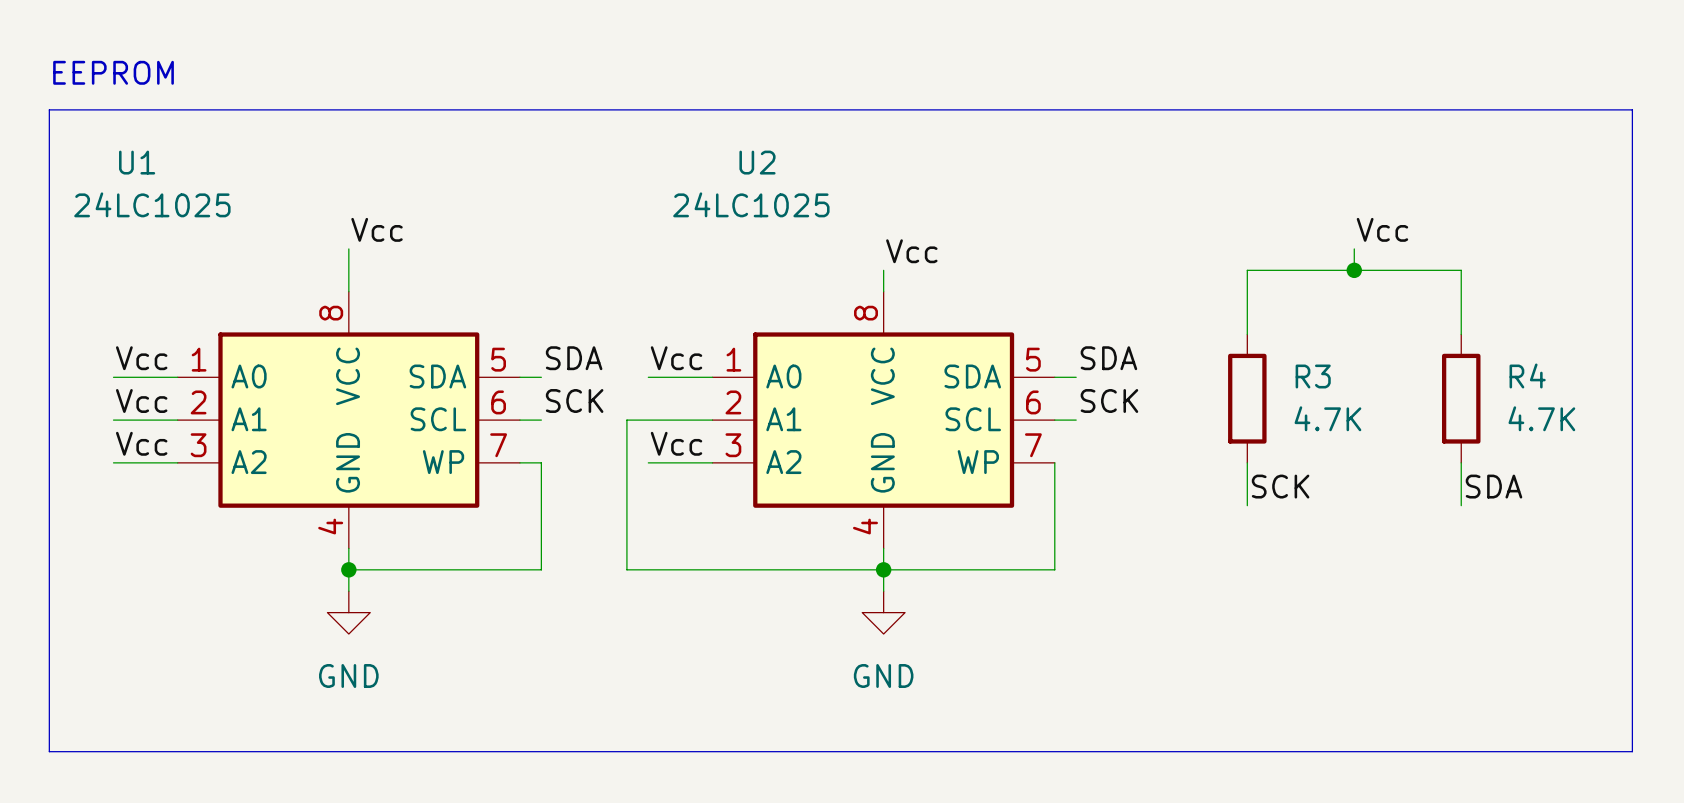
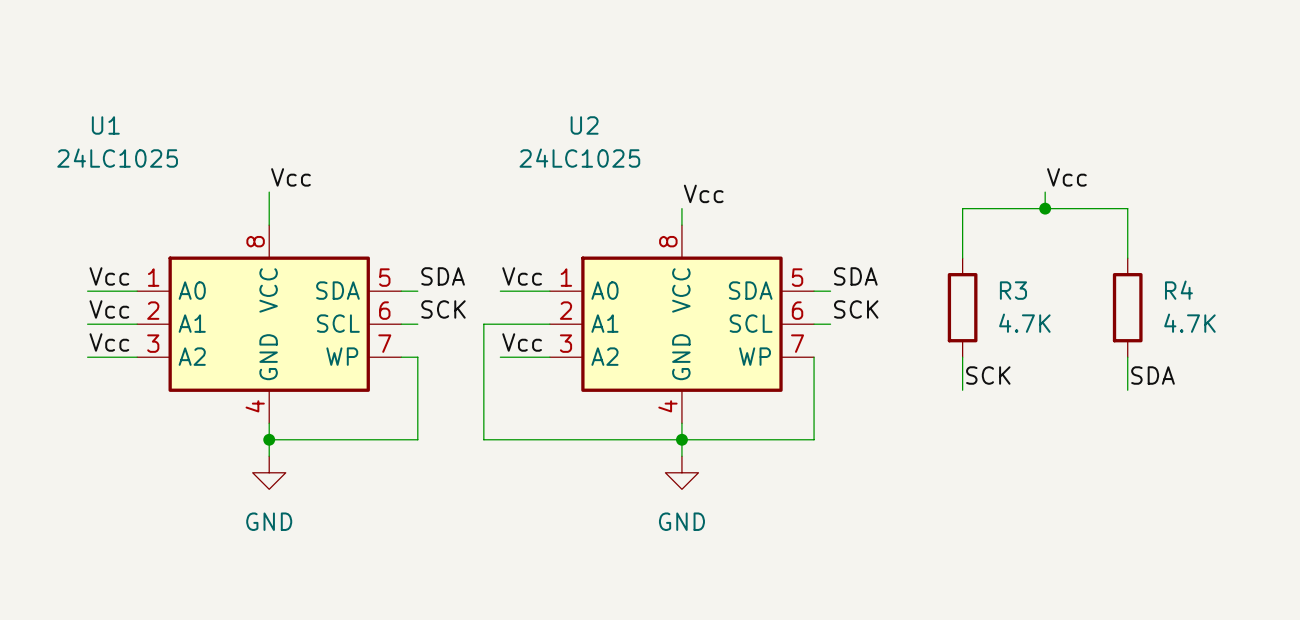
text: EEPROM (113, 72) -> none
line: (49, 109) (1632, 109) (1632, 751) (49, 751) (49, 109) -> none

